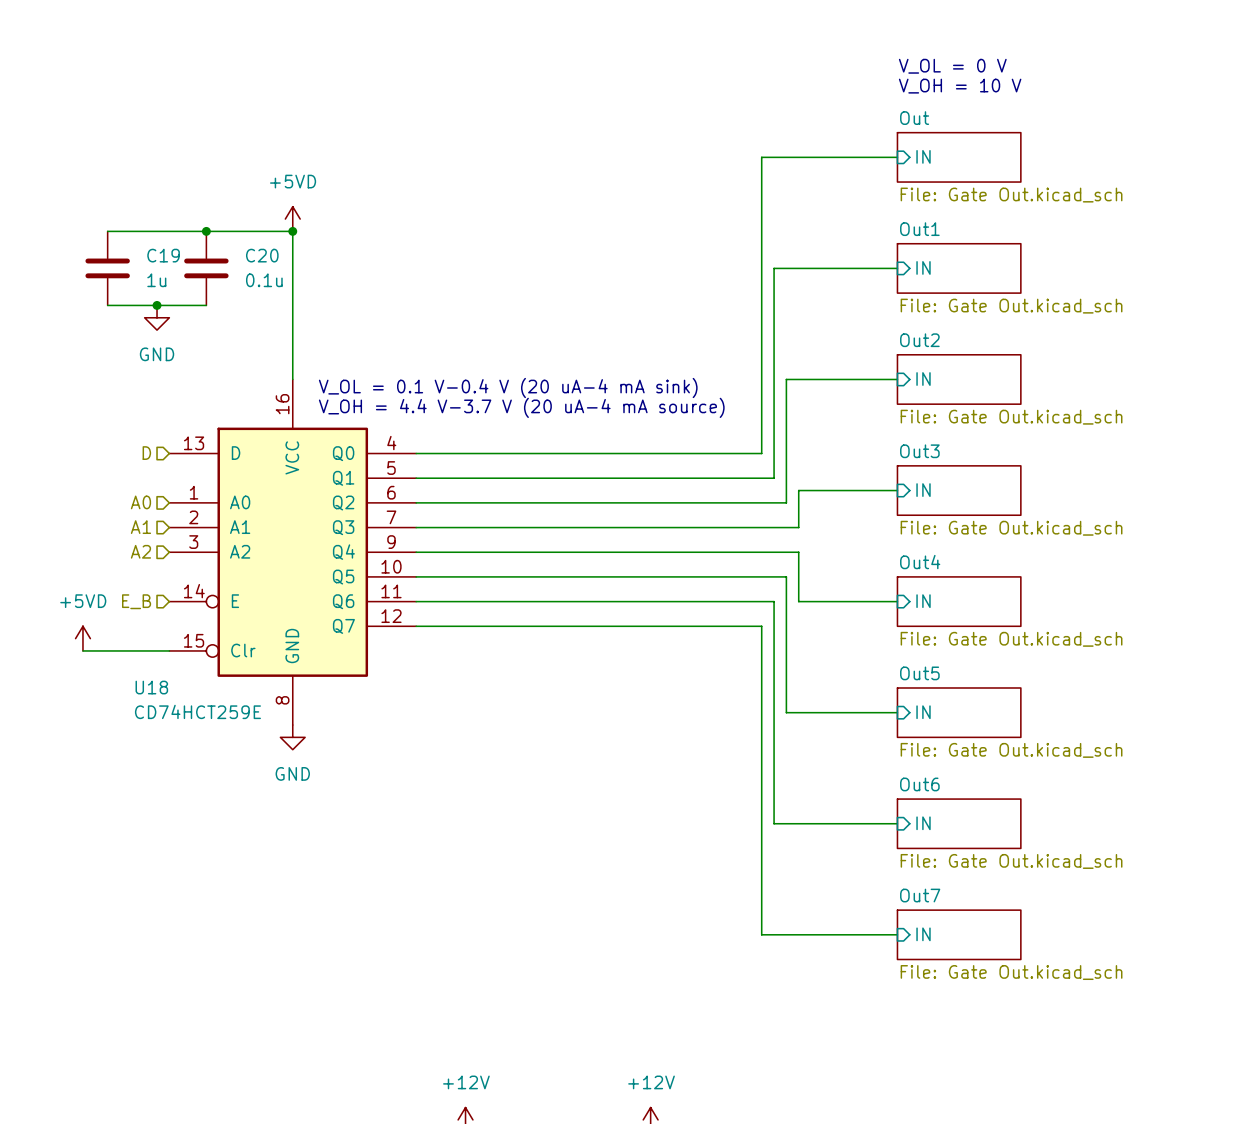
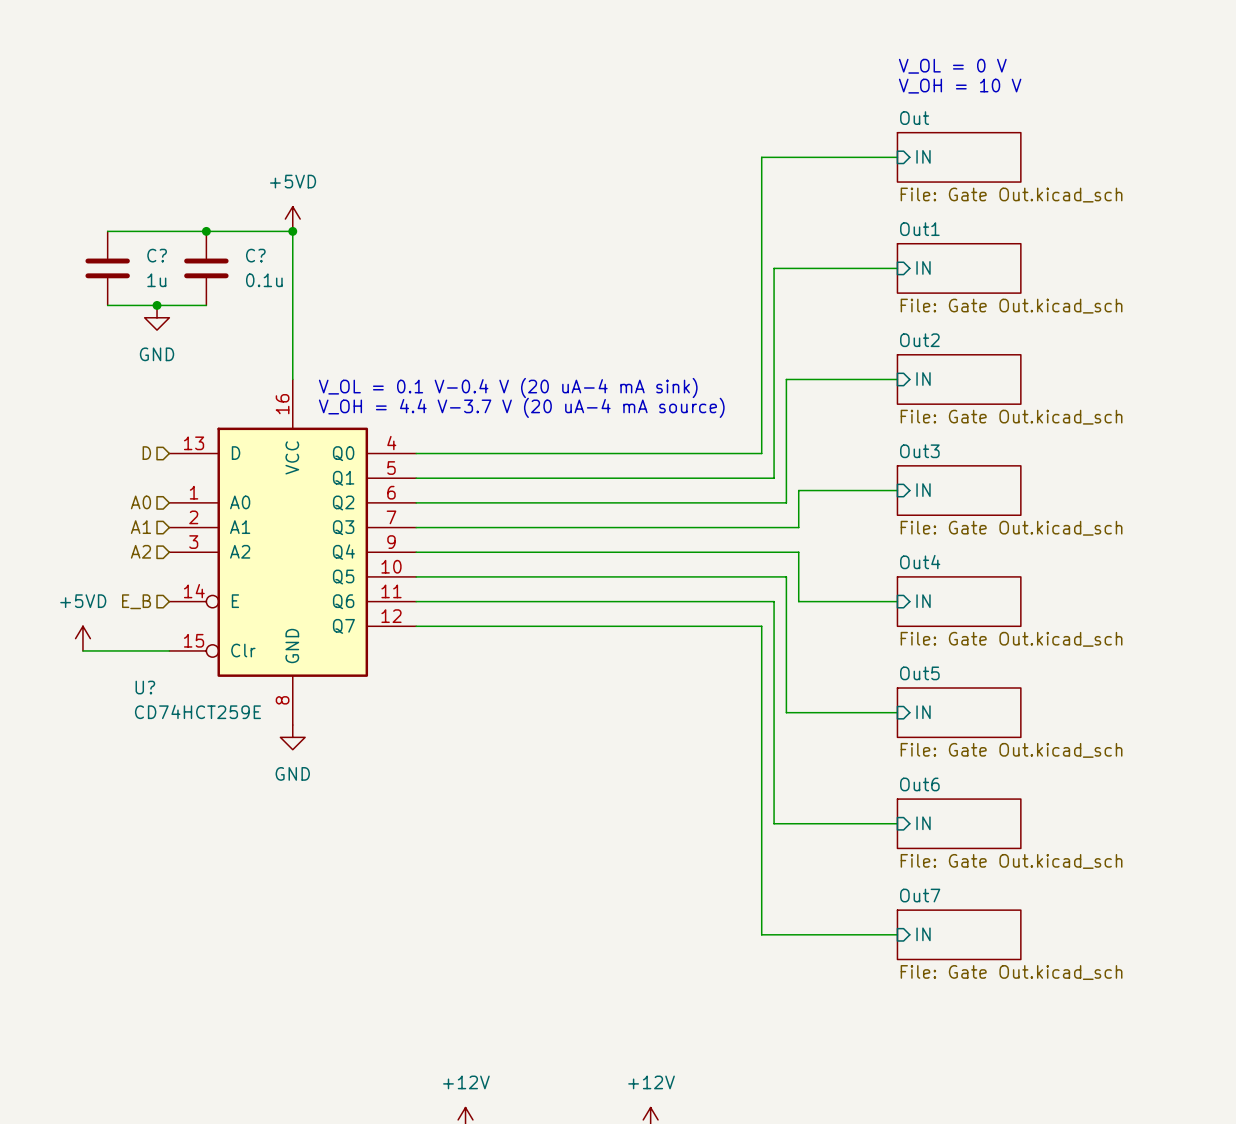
C19 name: C19 (163, 255) -> C? (157, 255)
C20 name: C20 (262, 255) -> C? (255, 255)
U18 name: U18 (151, 687) -> U? (145, 687)

